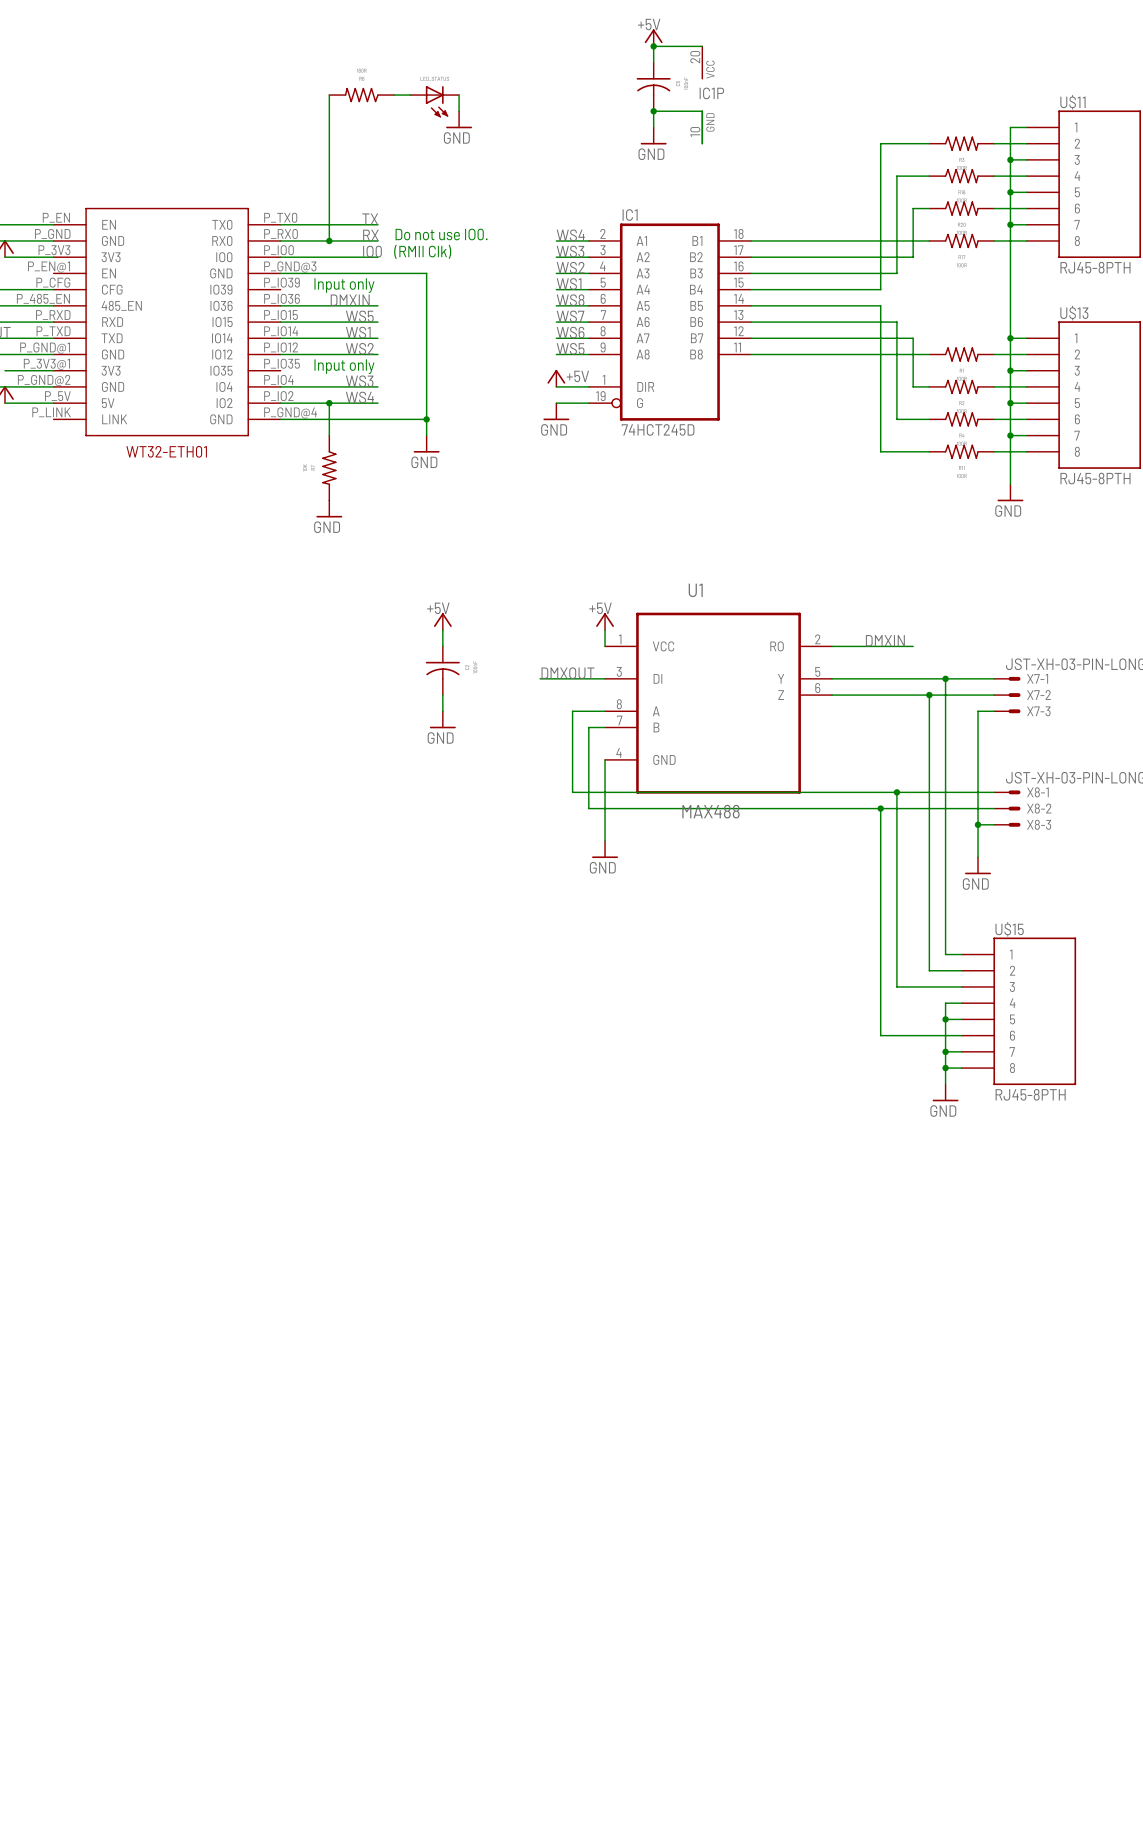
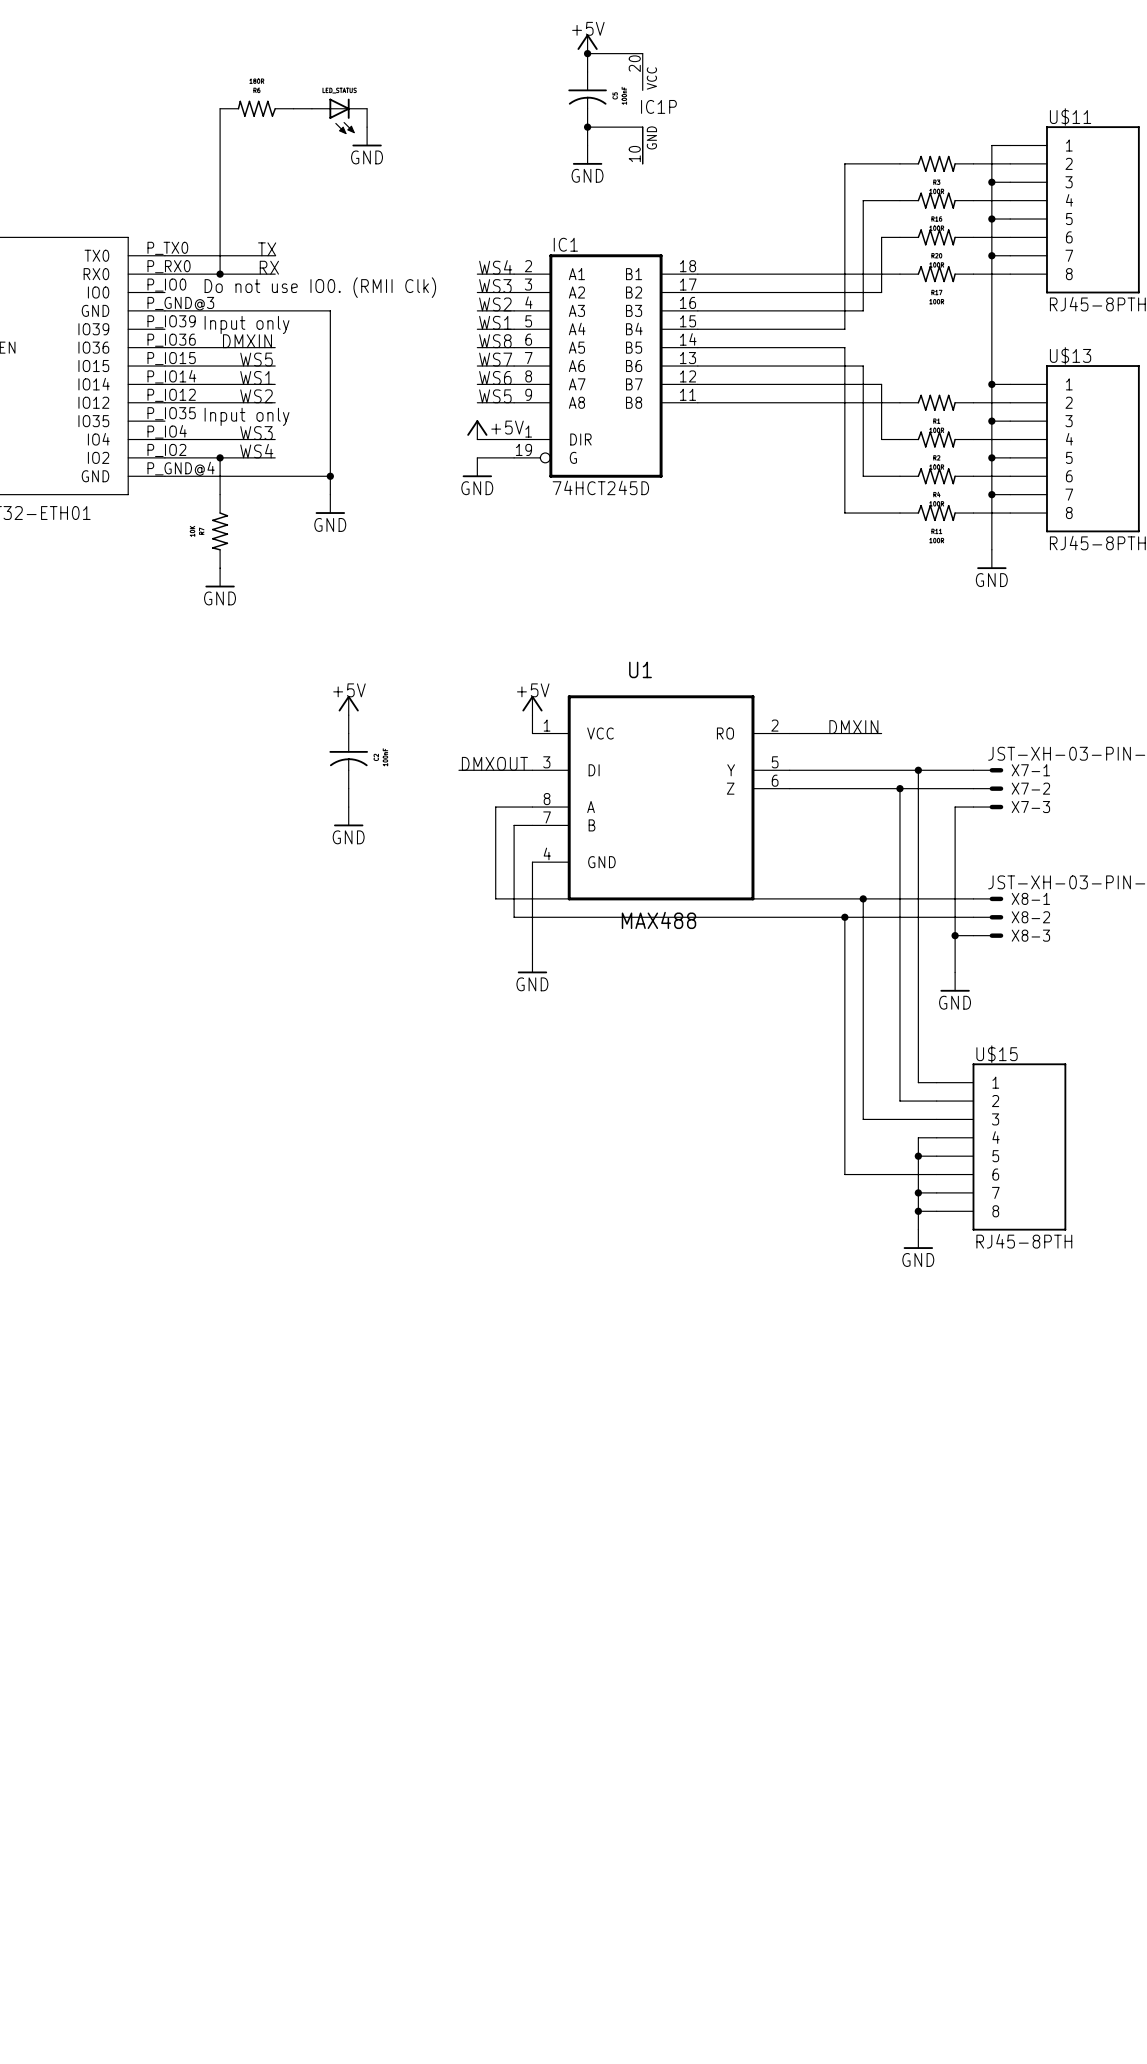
text: Do not use IO0. (441, 234) -> Do not use IO0. (RMII Clk) (320, 287)
label: IO0 (372, 251) -> none
text: (RMII Clk) (422, 251) -> none
wire: (280, 257) (377, 257) -> none

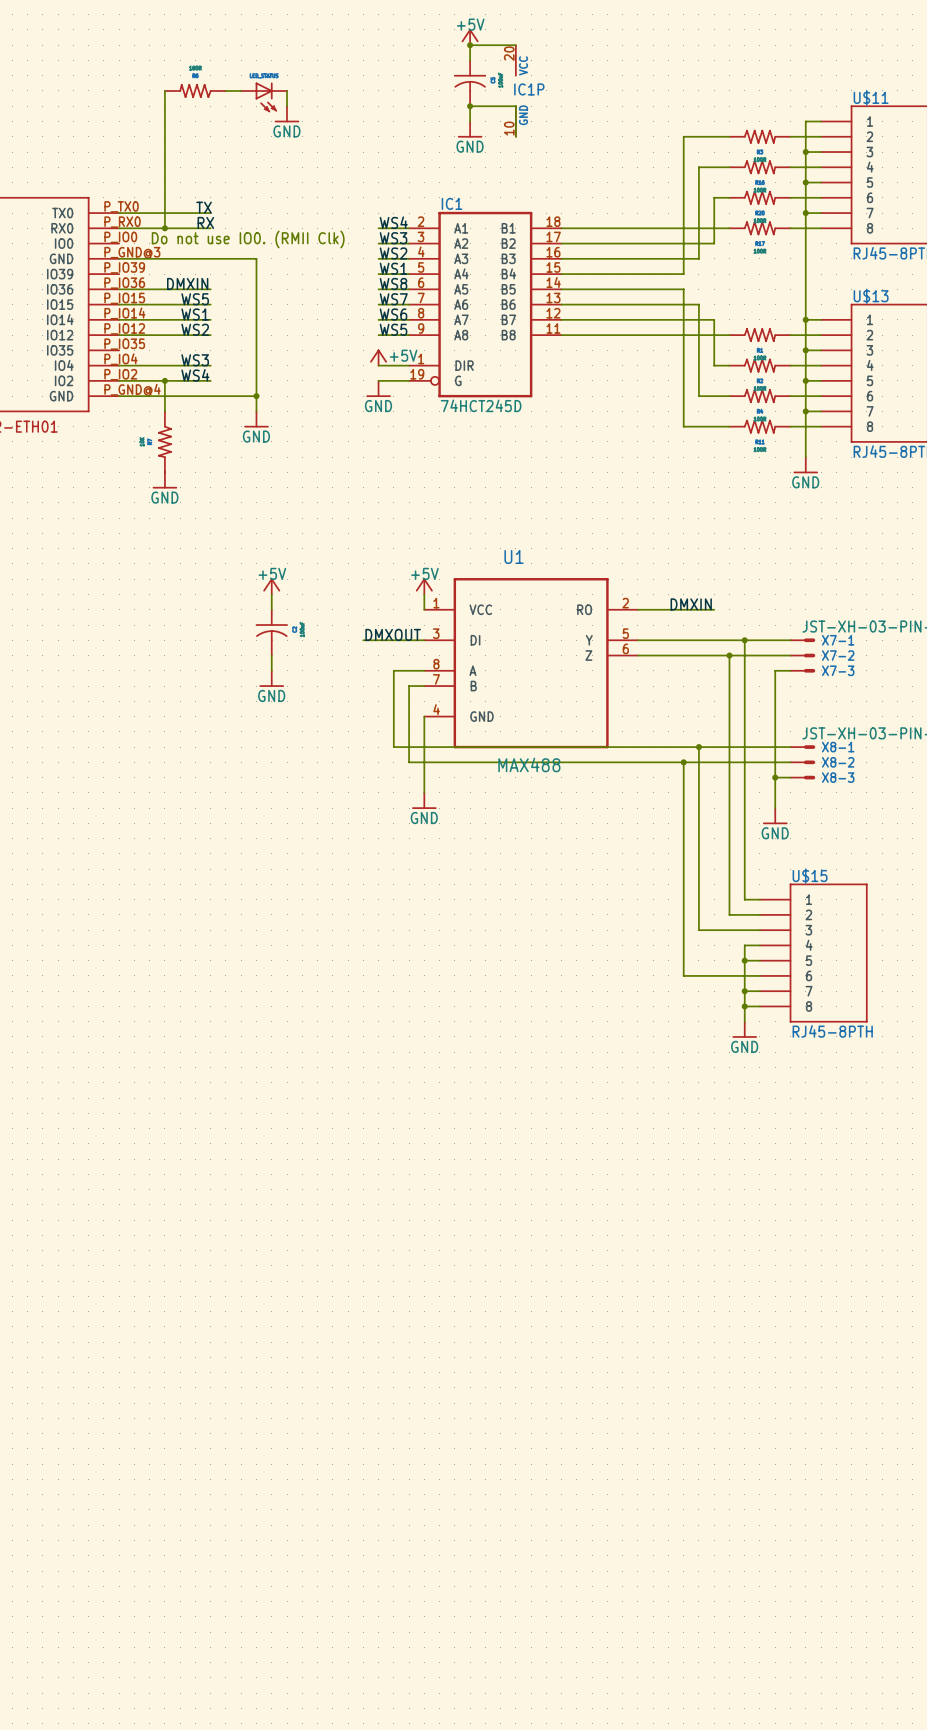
text: Input only (247, 324) -> none
text: Input only (247, 416) -> none

